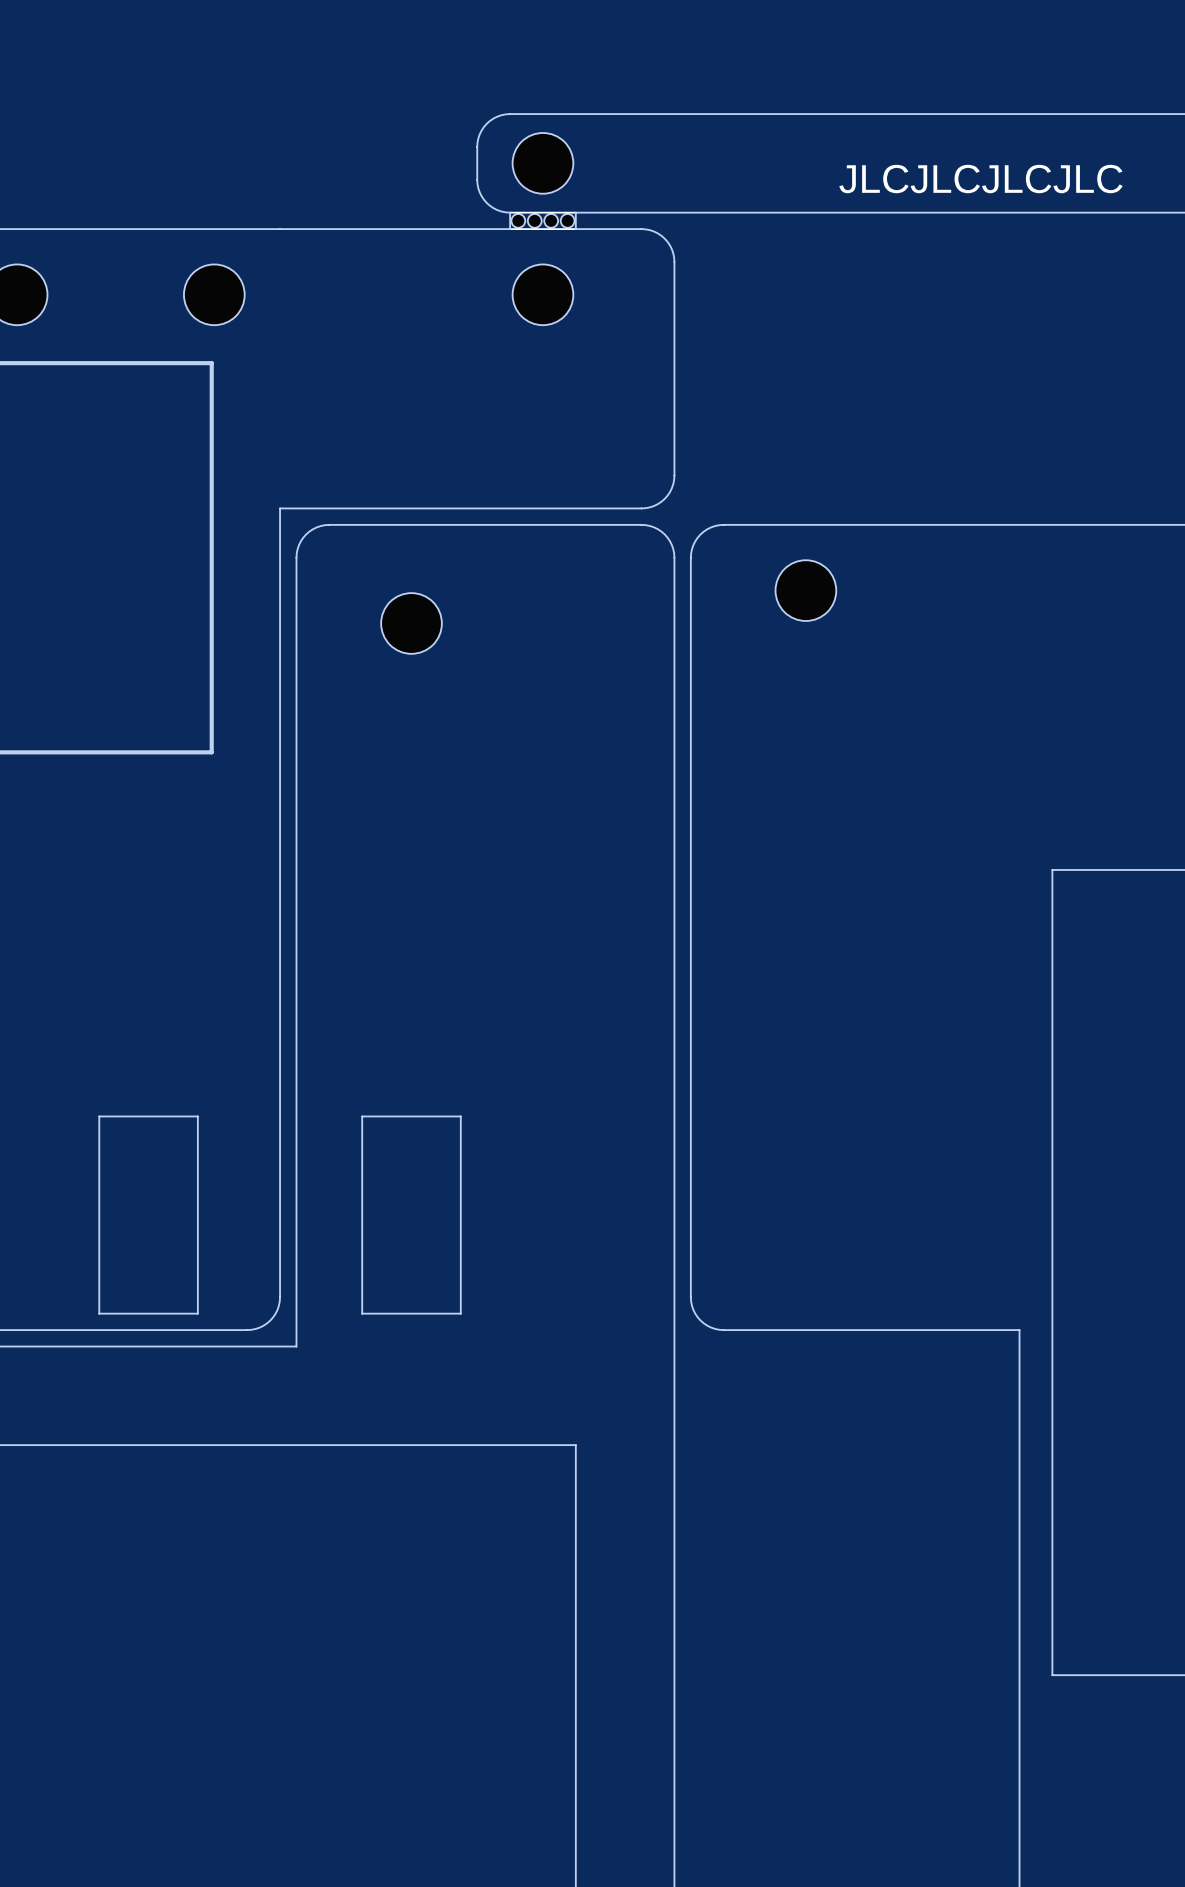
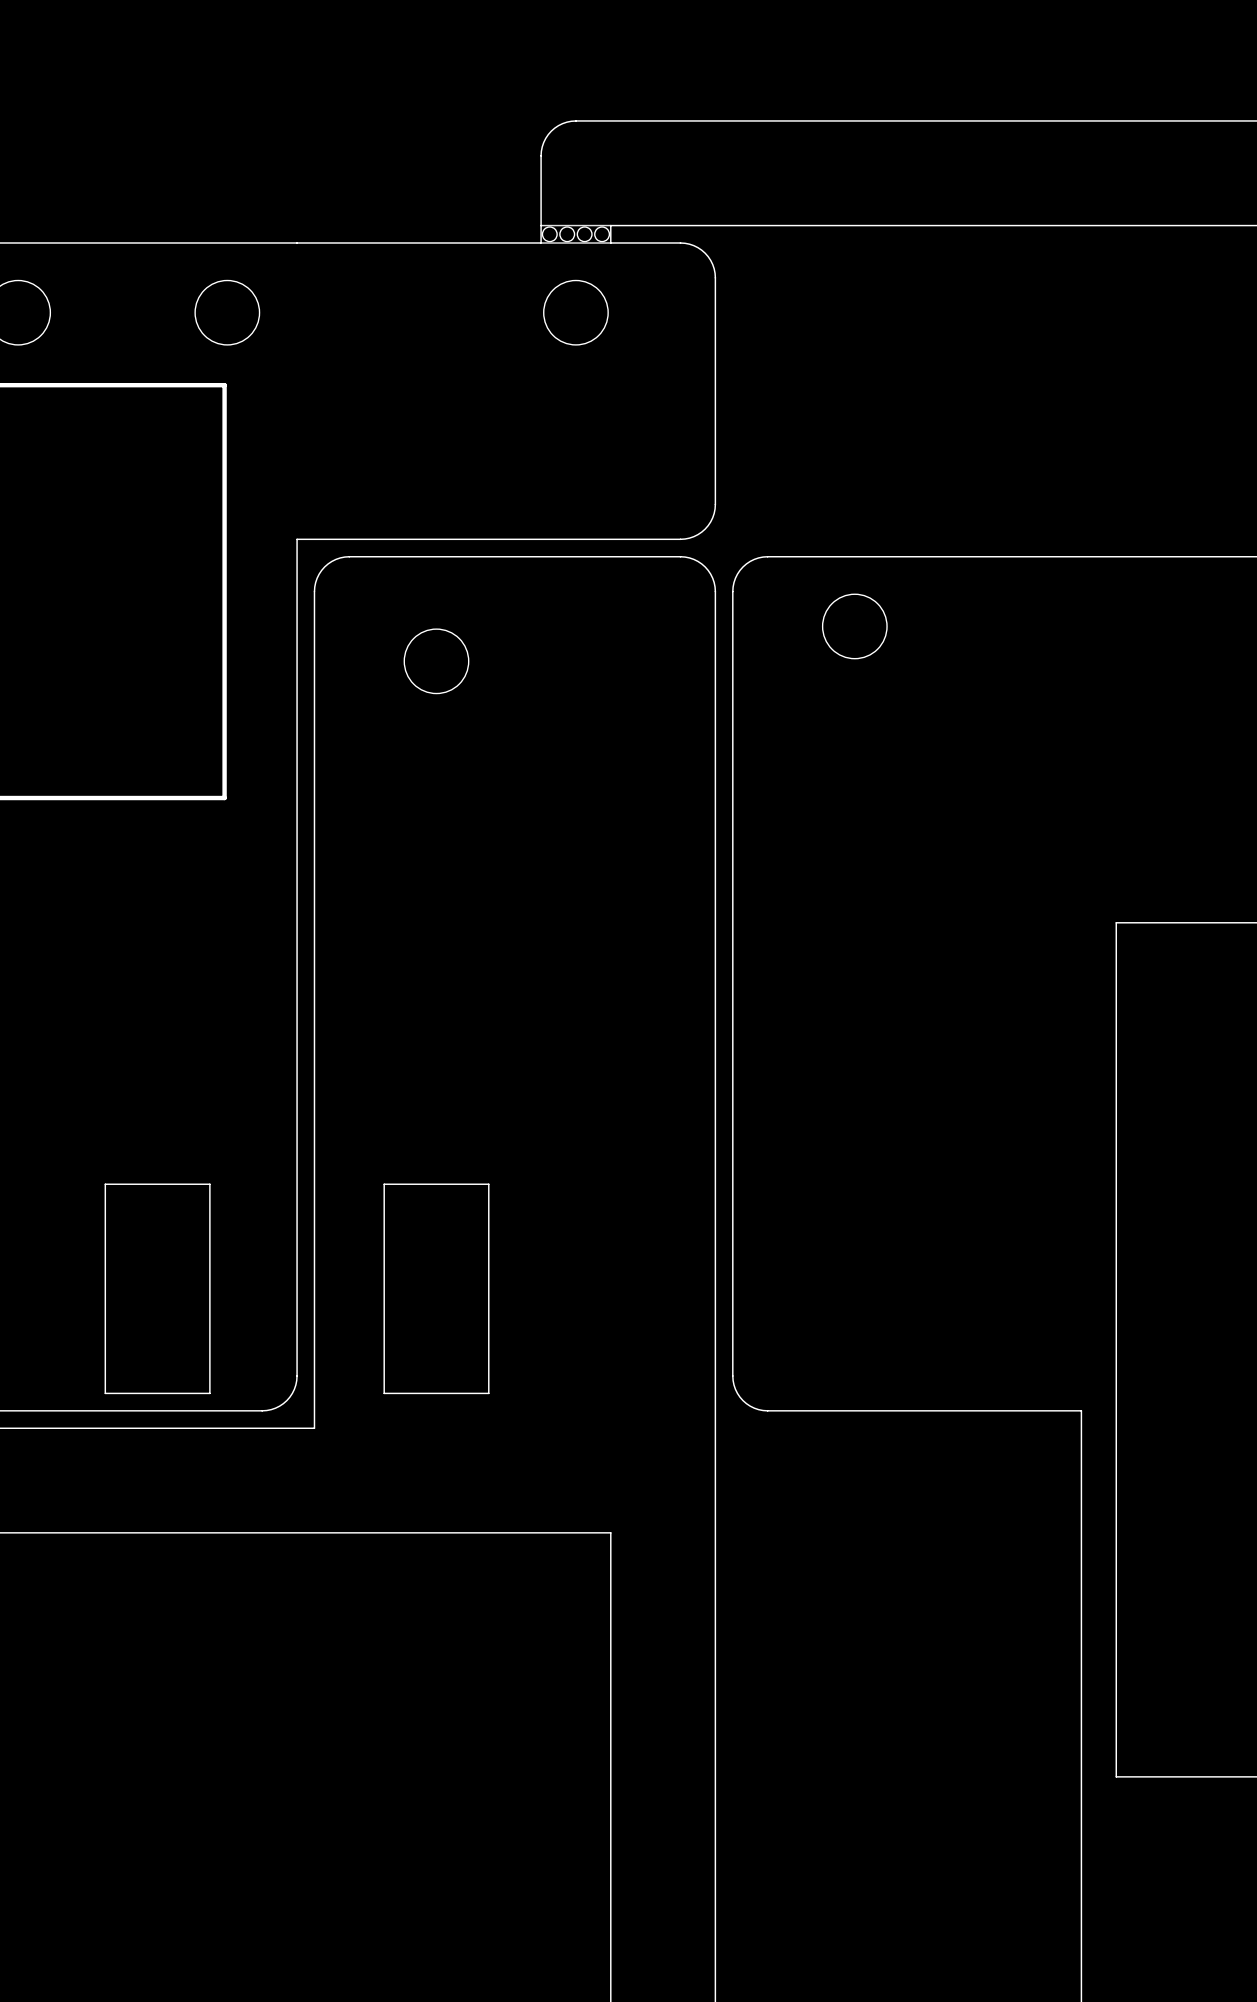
board edge: (542, 114) (510, 114) (497, 116) (486, 123) (478, 138) (477, 179) (479, 192) (484, 199) (493, 208) (510, 212) -> (575, 120) (562, 123) (554, 128) (545, 138) (542, 146) (541, 225)
part: (542, 163) -> none
text: JLCJLCJLCJLC (981, 179) -> none

